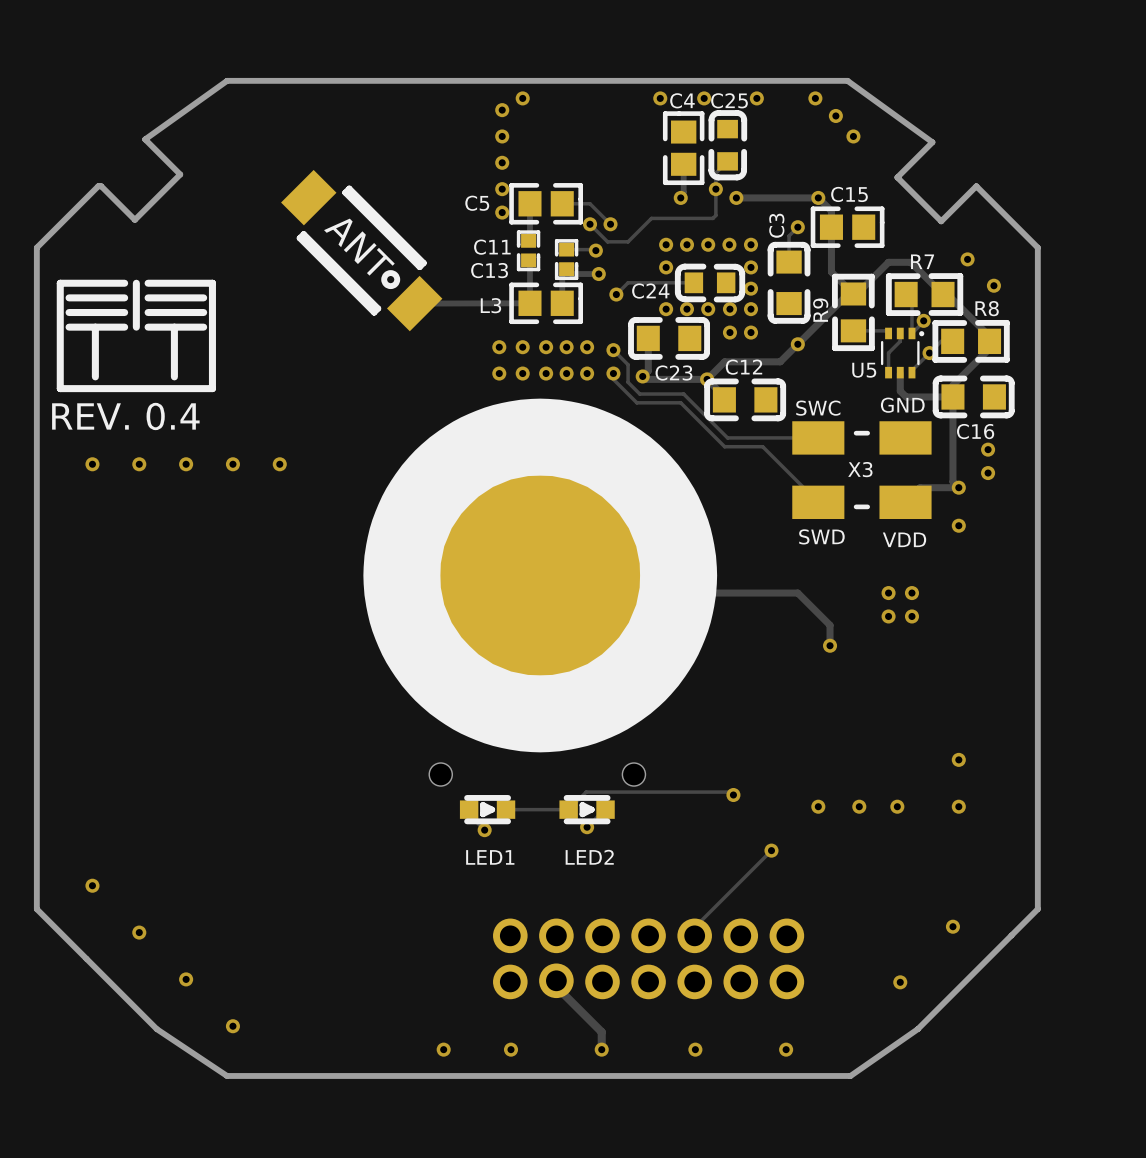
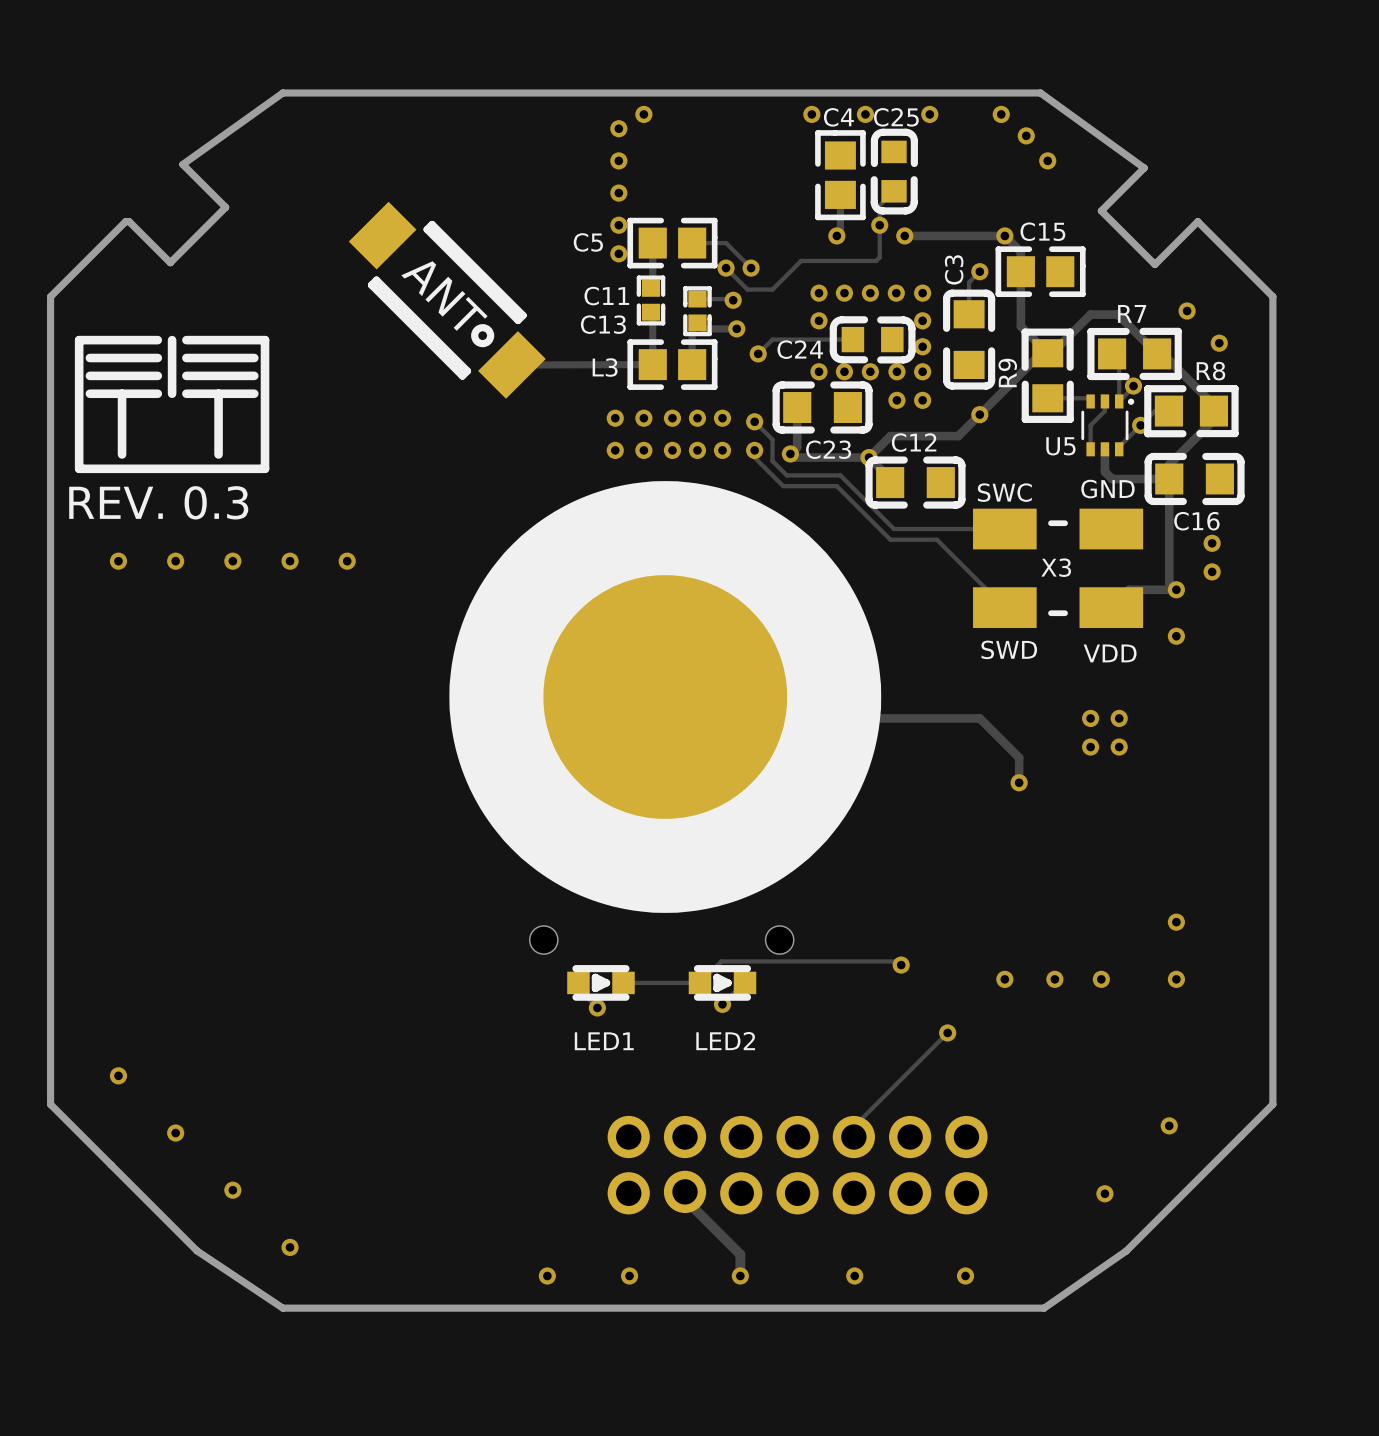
text: REV. 0.4 (125, 416) -> REV. 0.3 (158, 502)

